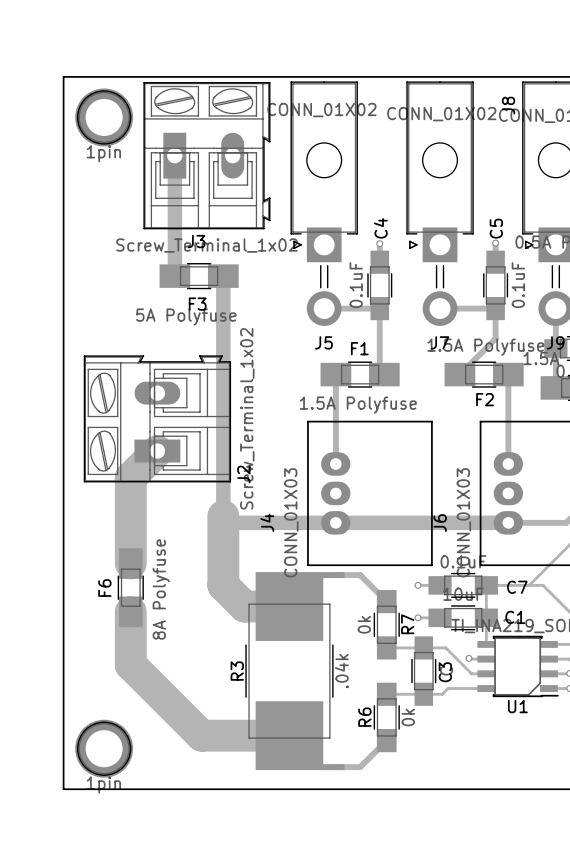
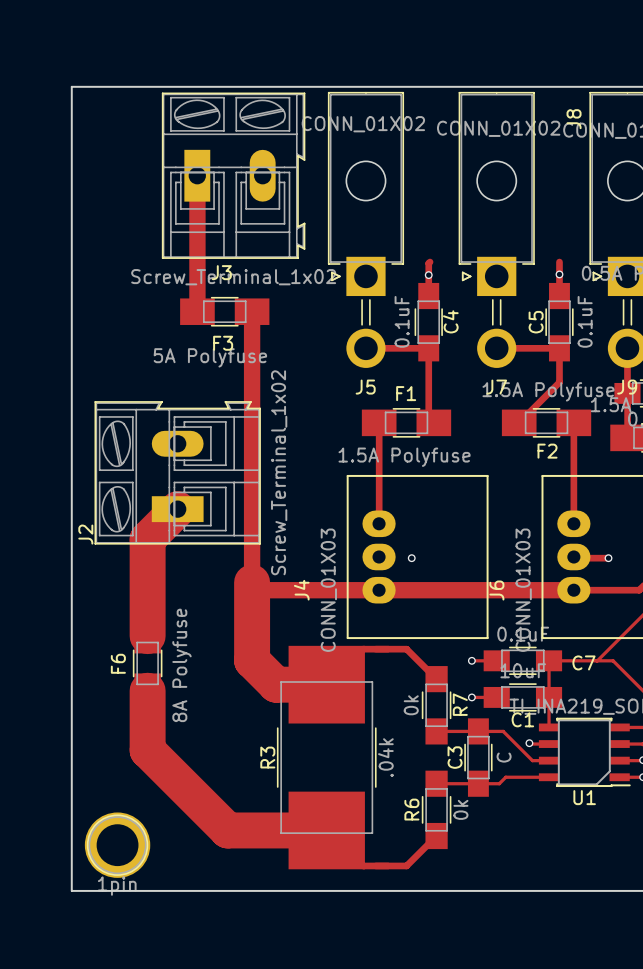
part: 1pin (104, 117) -> none
C4 name position: C4 (380, 228) -> C4 (450, 321)
C5 name position: C5 (496, 228) -> C5 (536, 322)
track: none -> (430, 262) (428, 275)
track: none -> (559, 262) (559, 274)
J2 name position: J2 (243, 474) -> J2 (85, 534)
via: none -> (411, 558)
track: none -> (575, 558) (608, 558)
via: none -> (608, 558)
C1 name position: C1 (515, 617) -> C1 (522, 719)
C3 name position: C3 (445, 672) -> C3 (455, 757)

